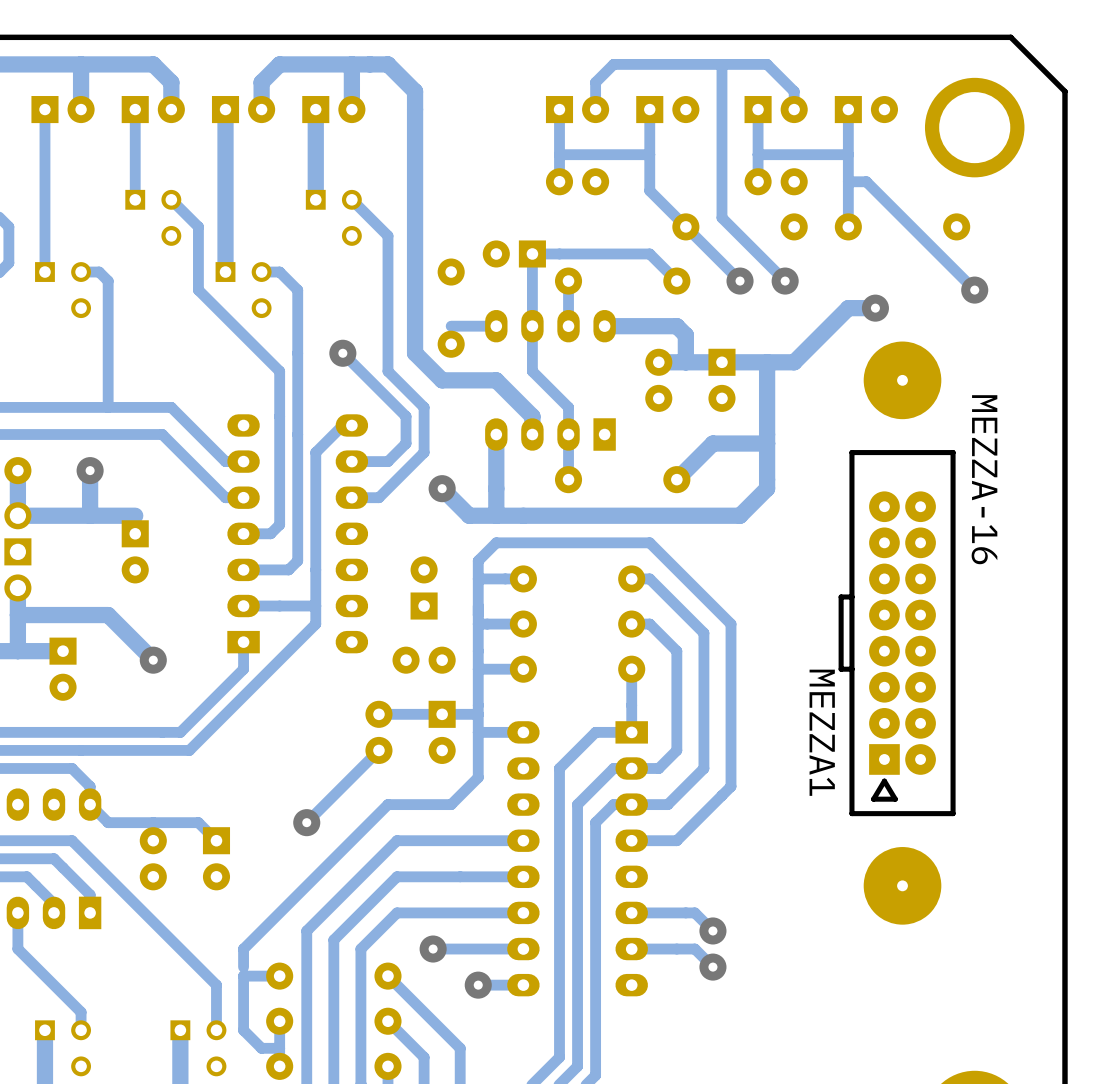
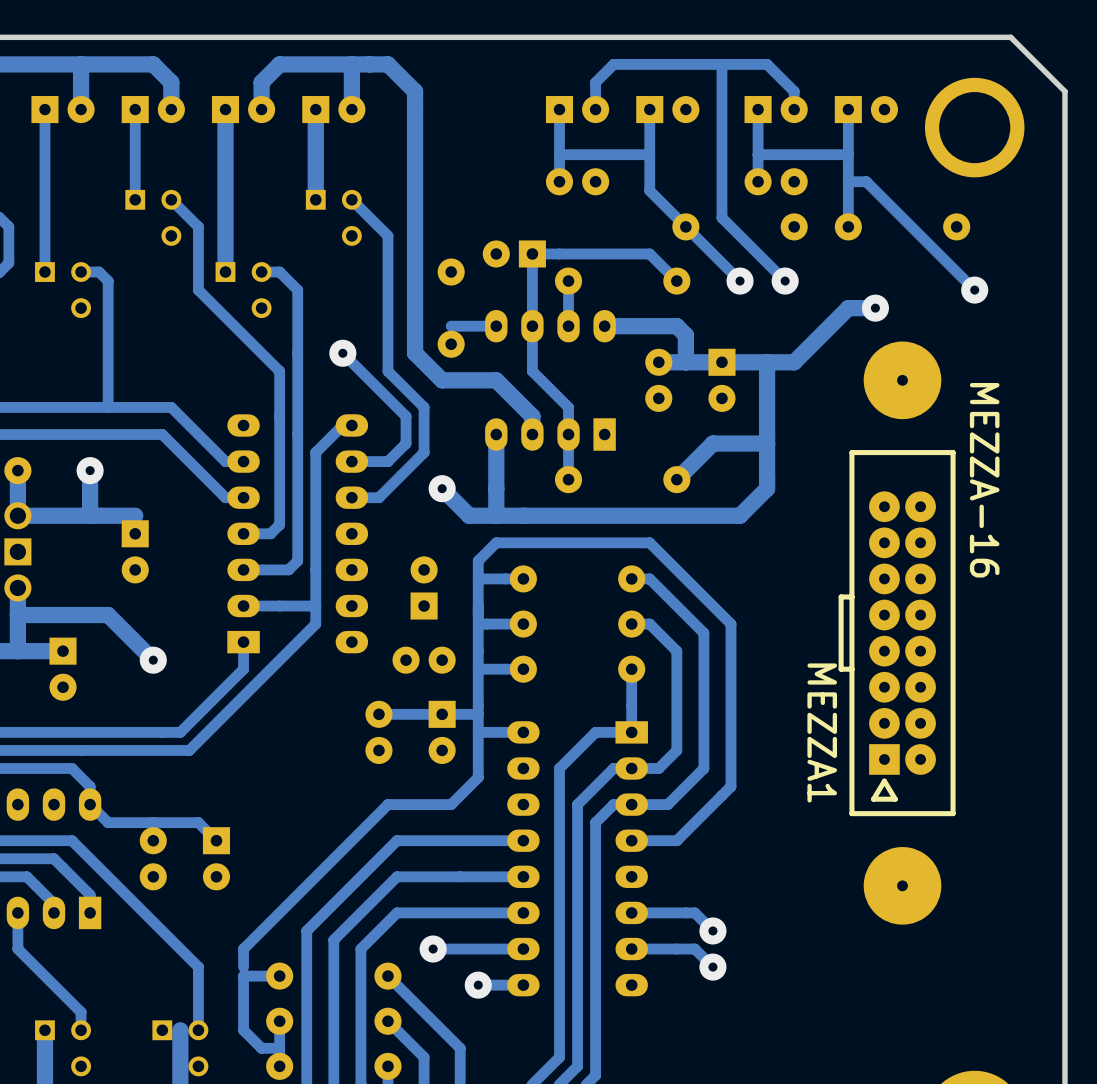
track: (378, 750) (306, 822) -> none
via: (306, 822) -> none
track: (198, 967) (216, 985) (216, 1030) -> (198, 967) (198, 1030)
part position: (198, 1048) -> (180, 1048)

